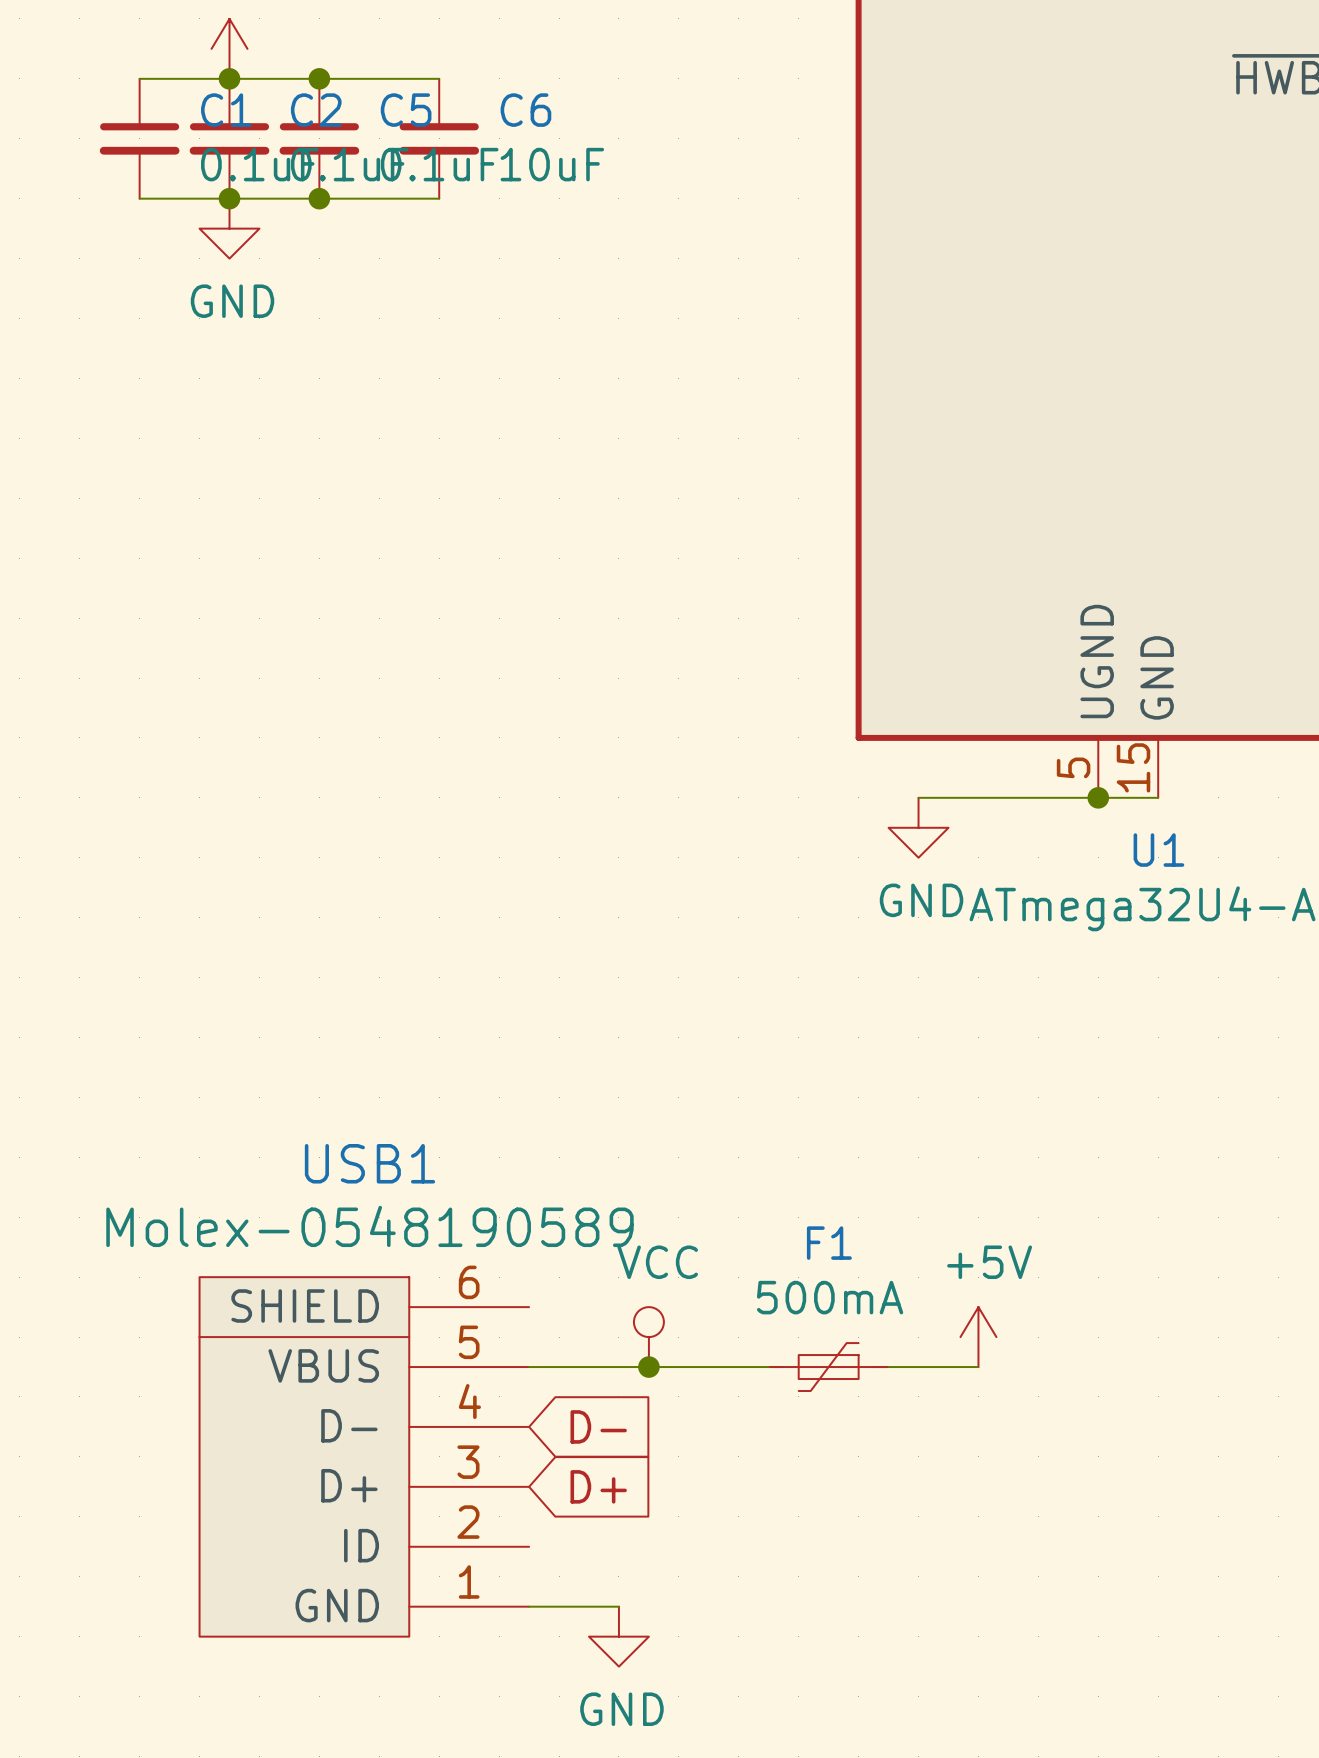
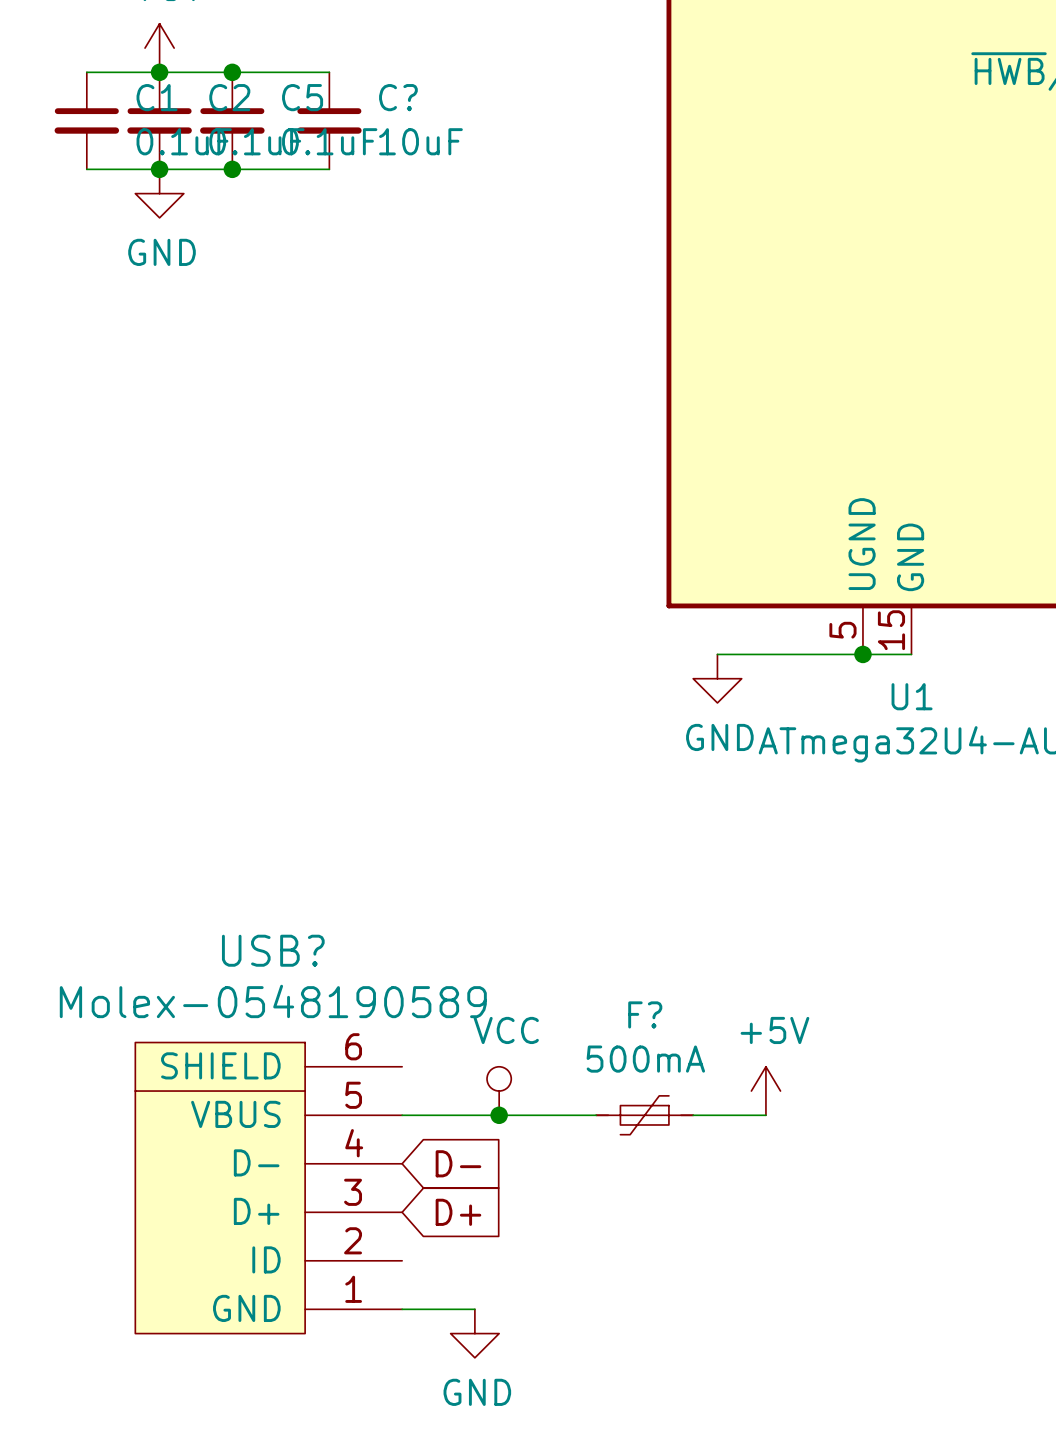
C6 name: C6 (525, 110) -> C? (398, 97)
USB1 name: USB1 (369, 1163) -> USB? (273, 950)
F1 name: F1 (829, 1243) -> F? (645, 1014)

